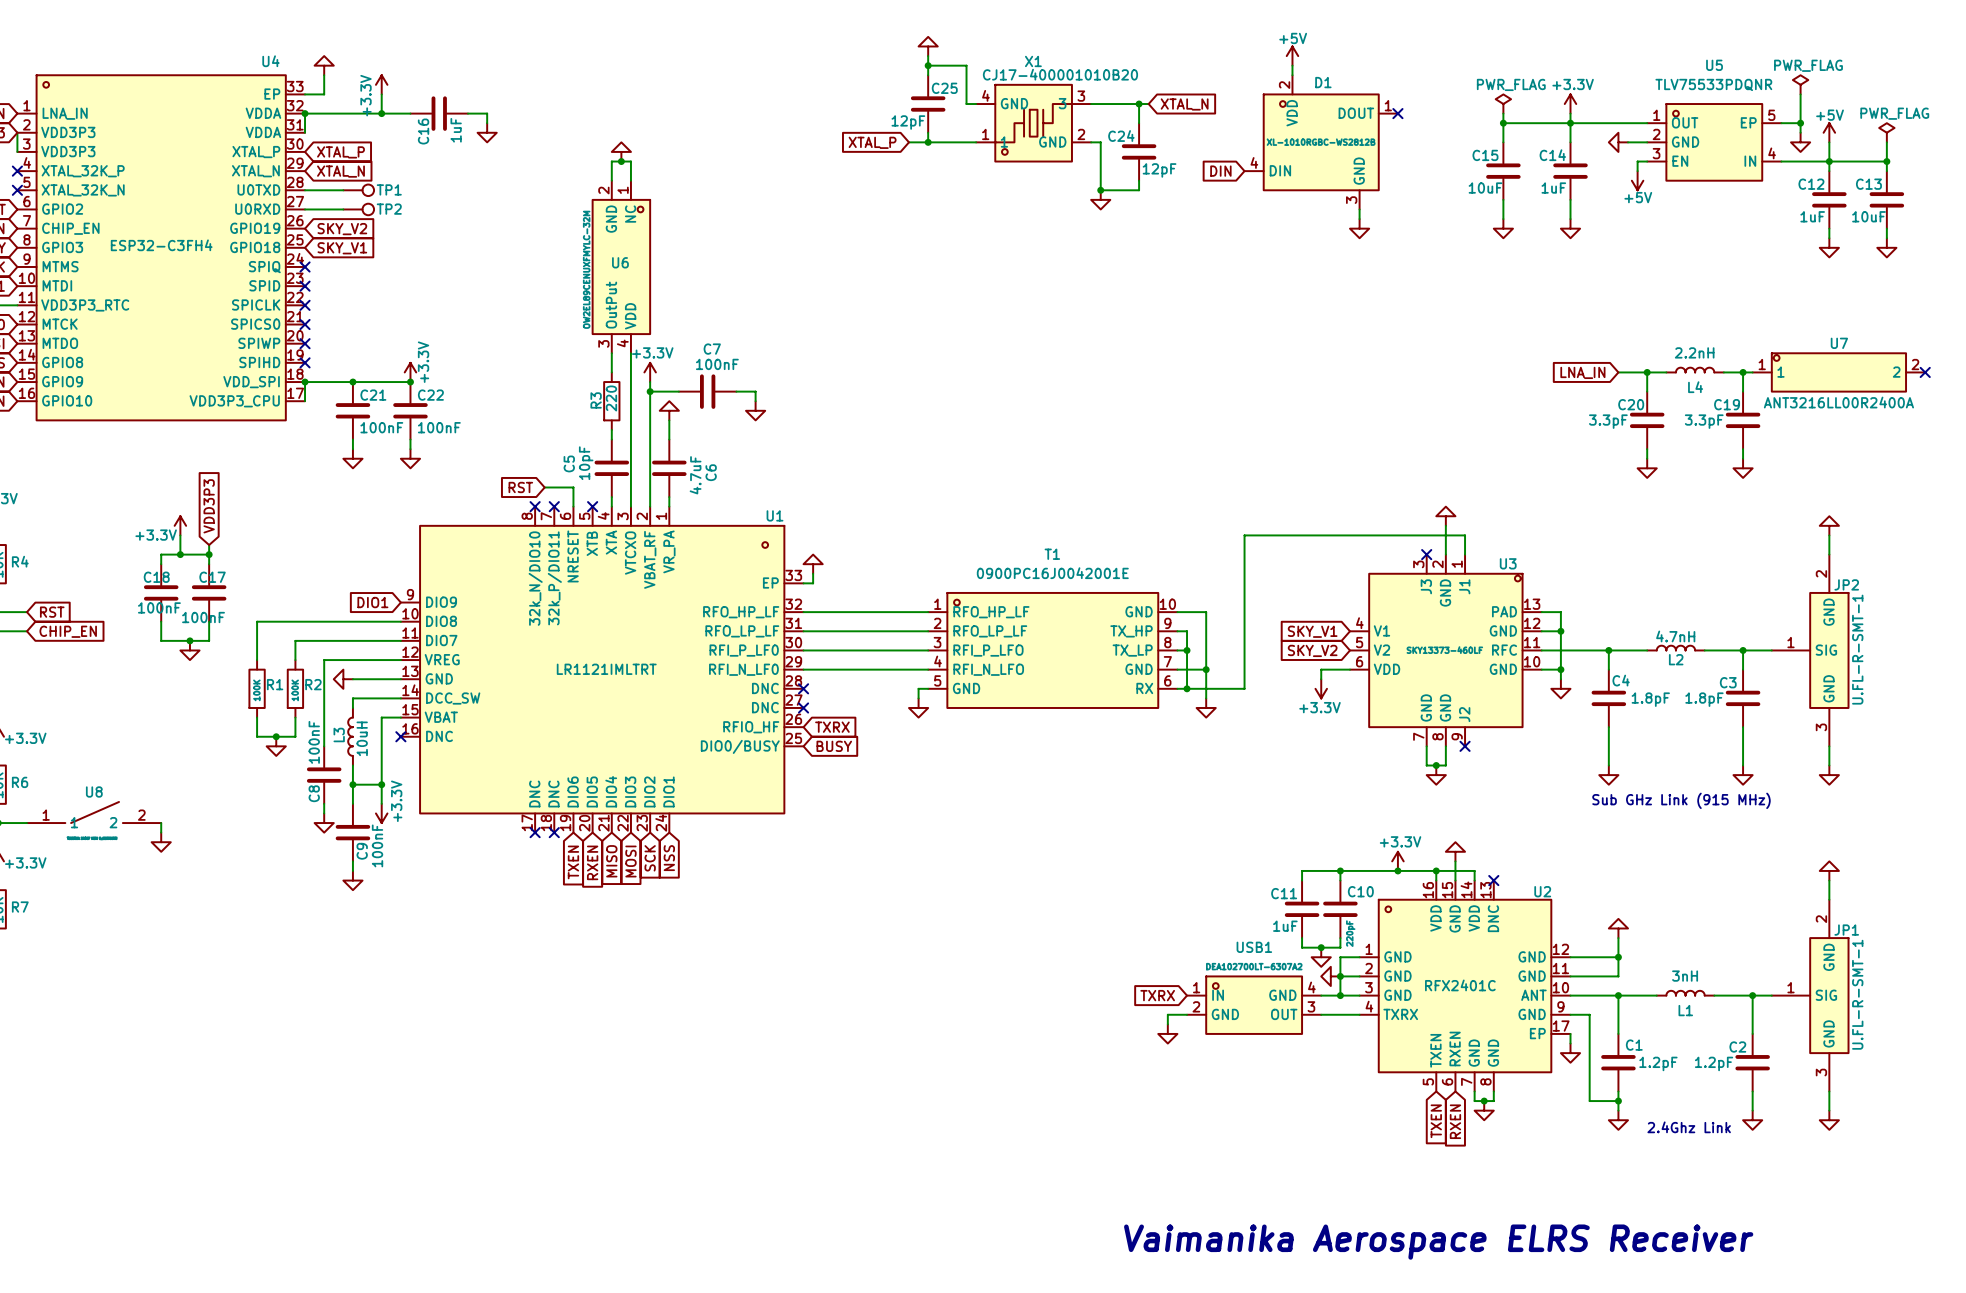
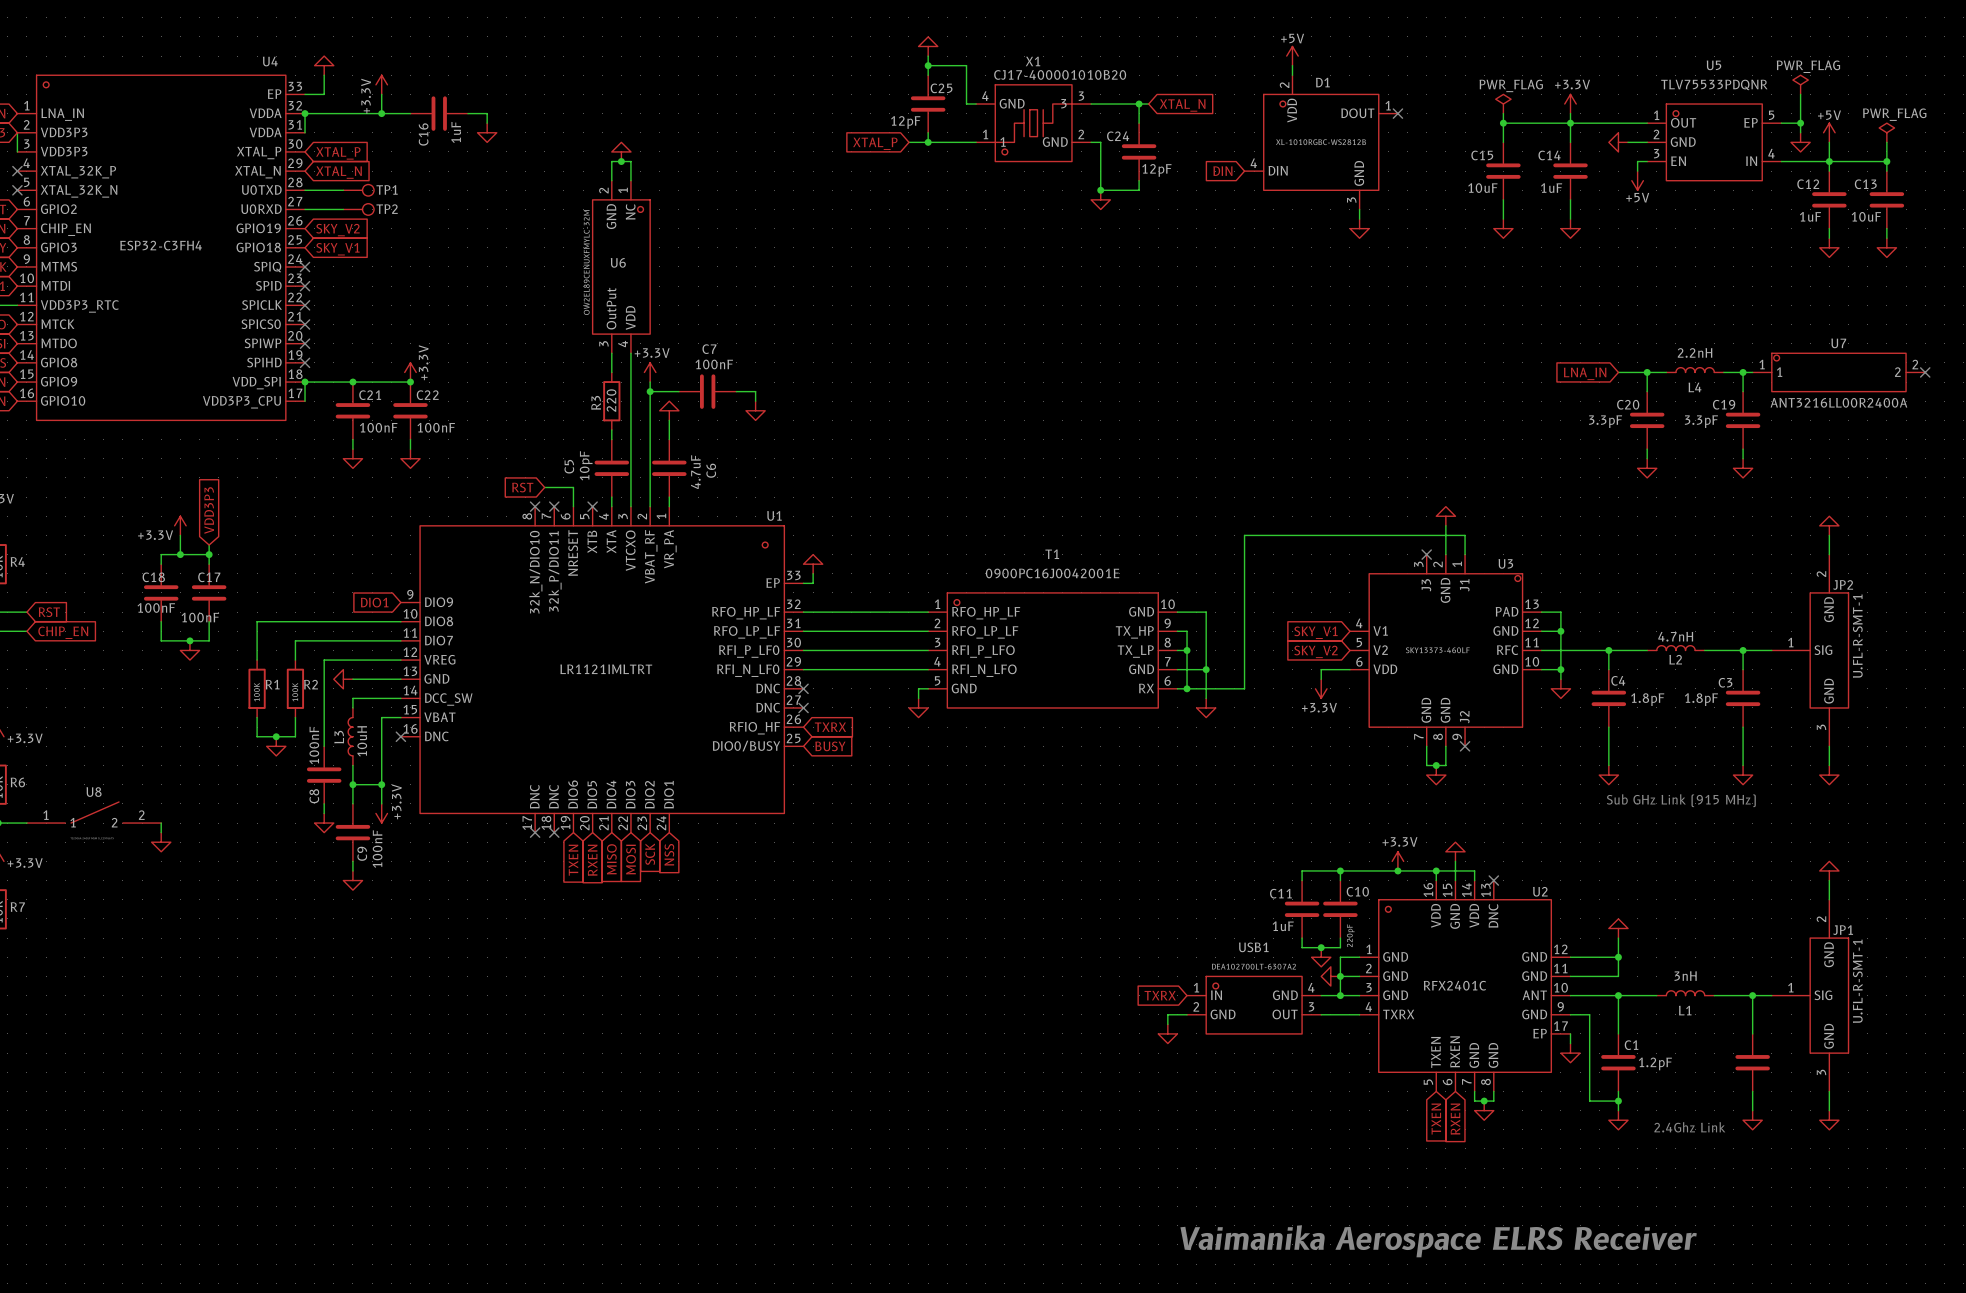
C2 name: C2 (1737, 1047) -> none
C2 value: 1.2pF (1714, 1063) -> none

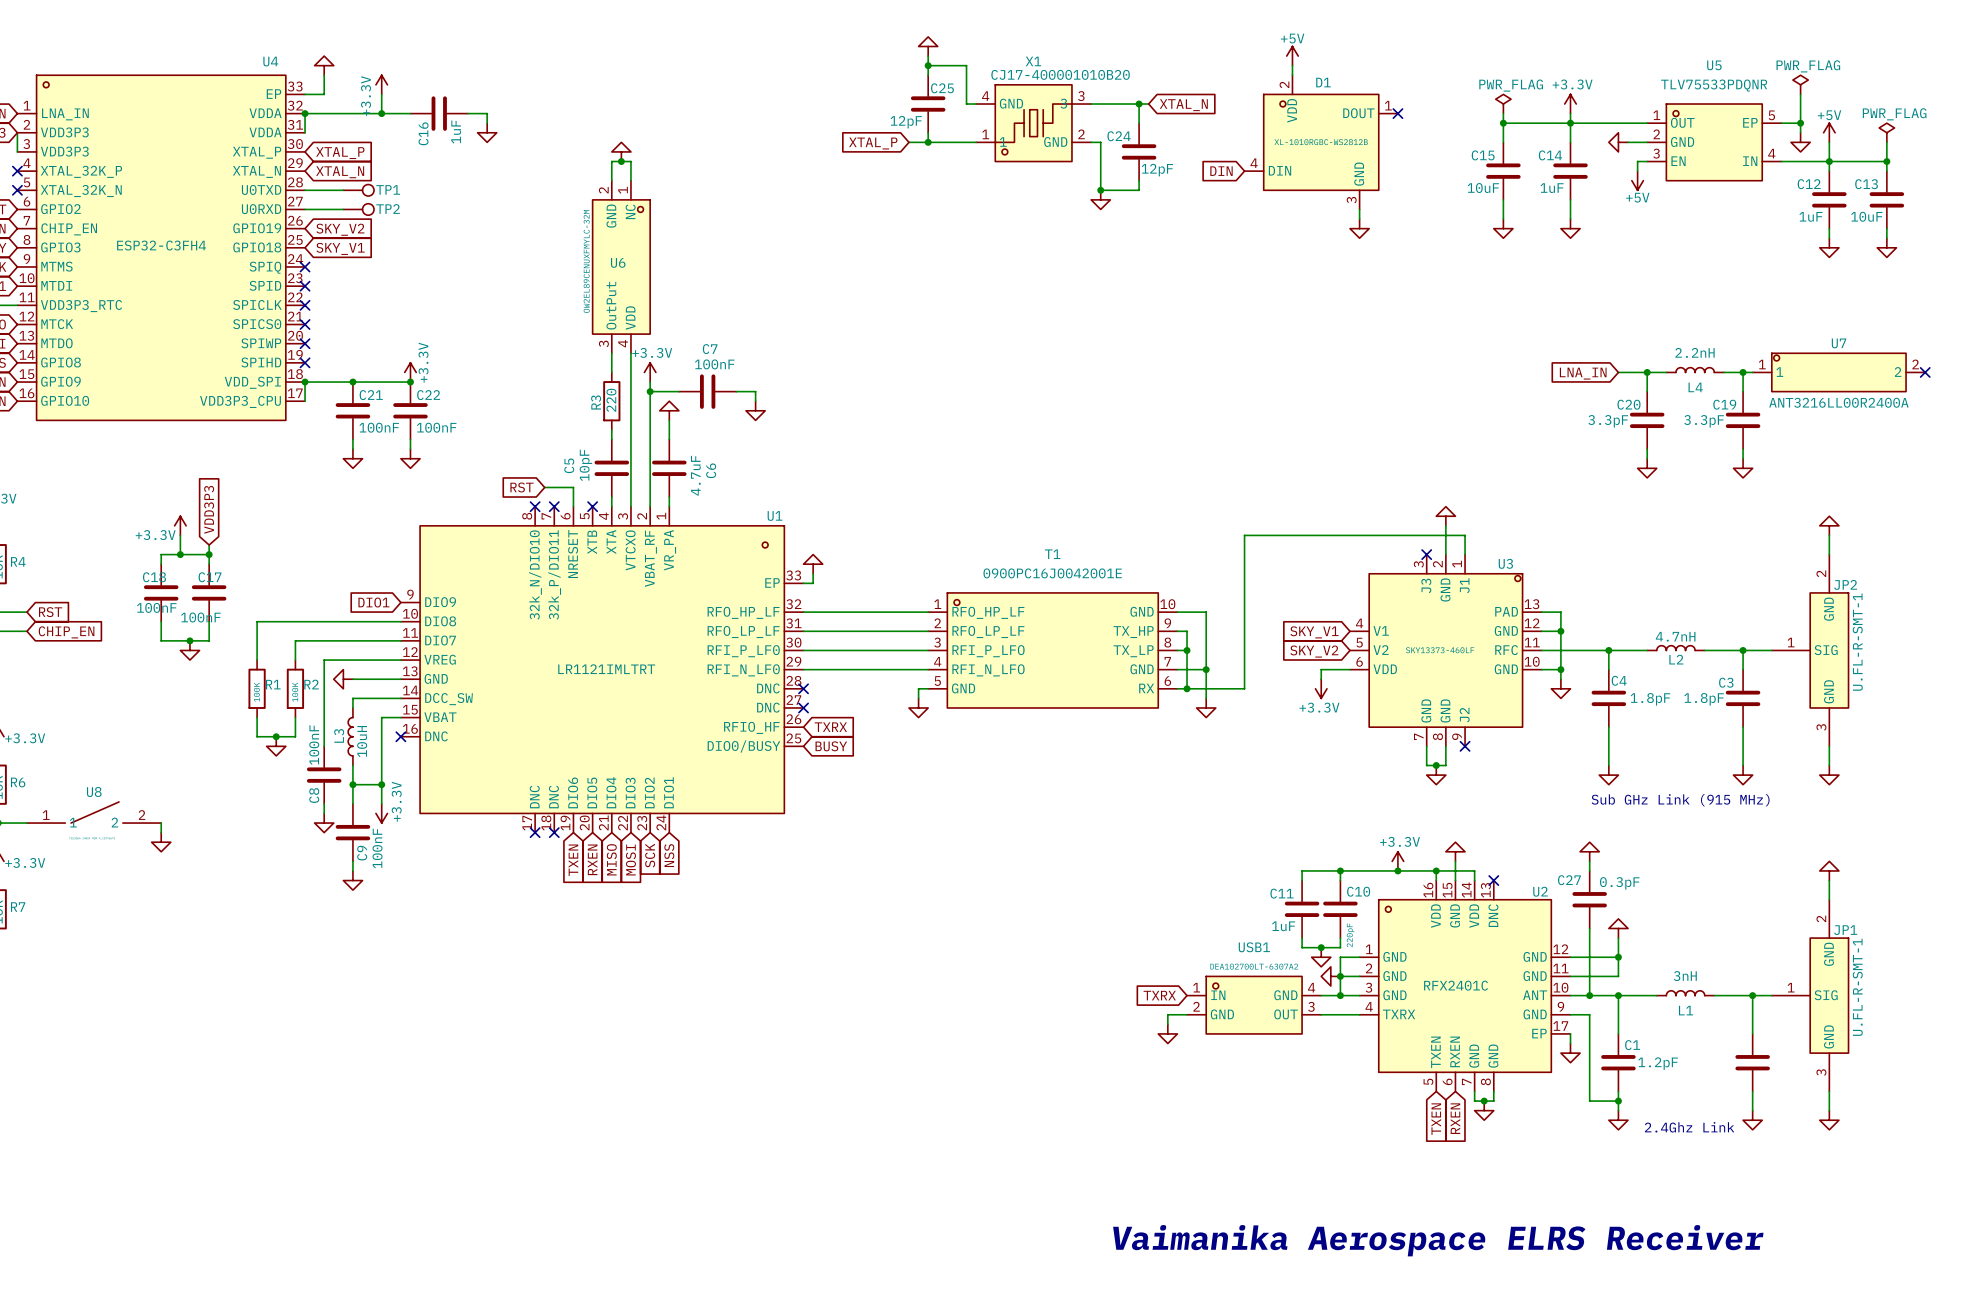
power symbol: none -> (1589, 851)
wire: none -> (1589, 861) (1589, 870)
C27: none -> 0.3pF (1589, 899)
wire: none -> (1589, 928) (1589, 995)
junction: none -> (1589, 995)

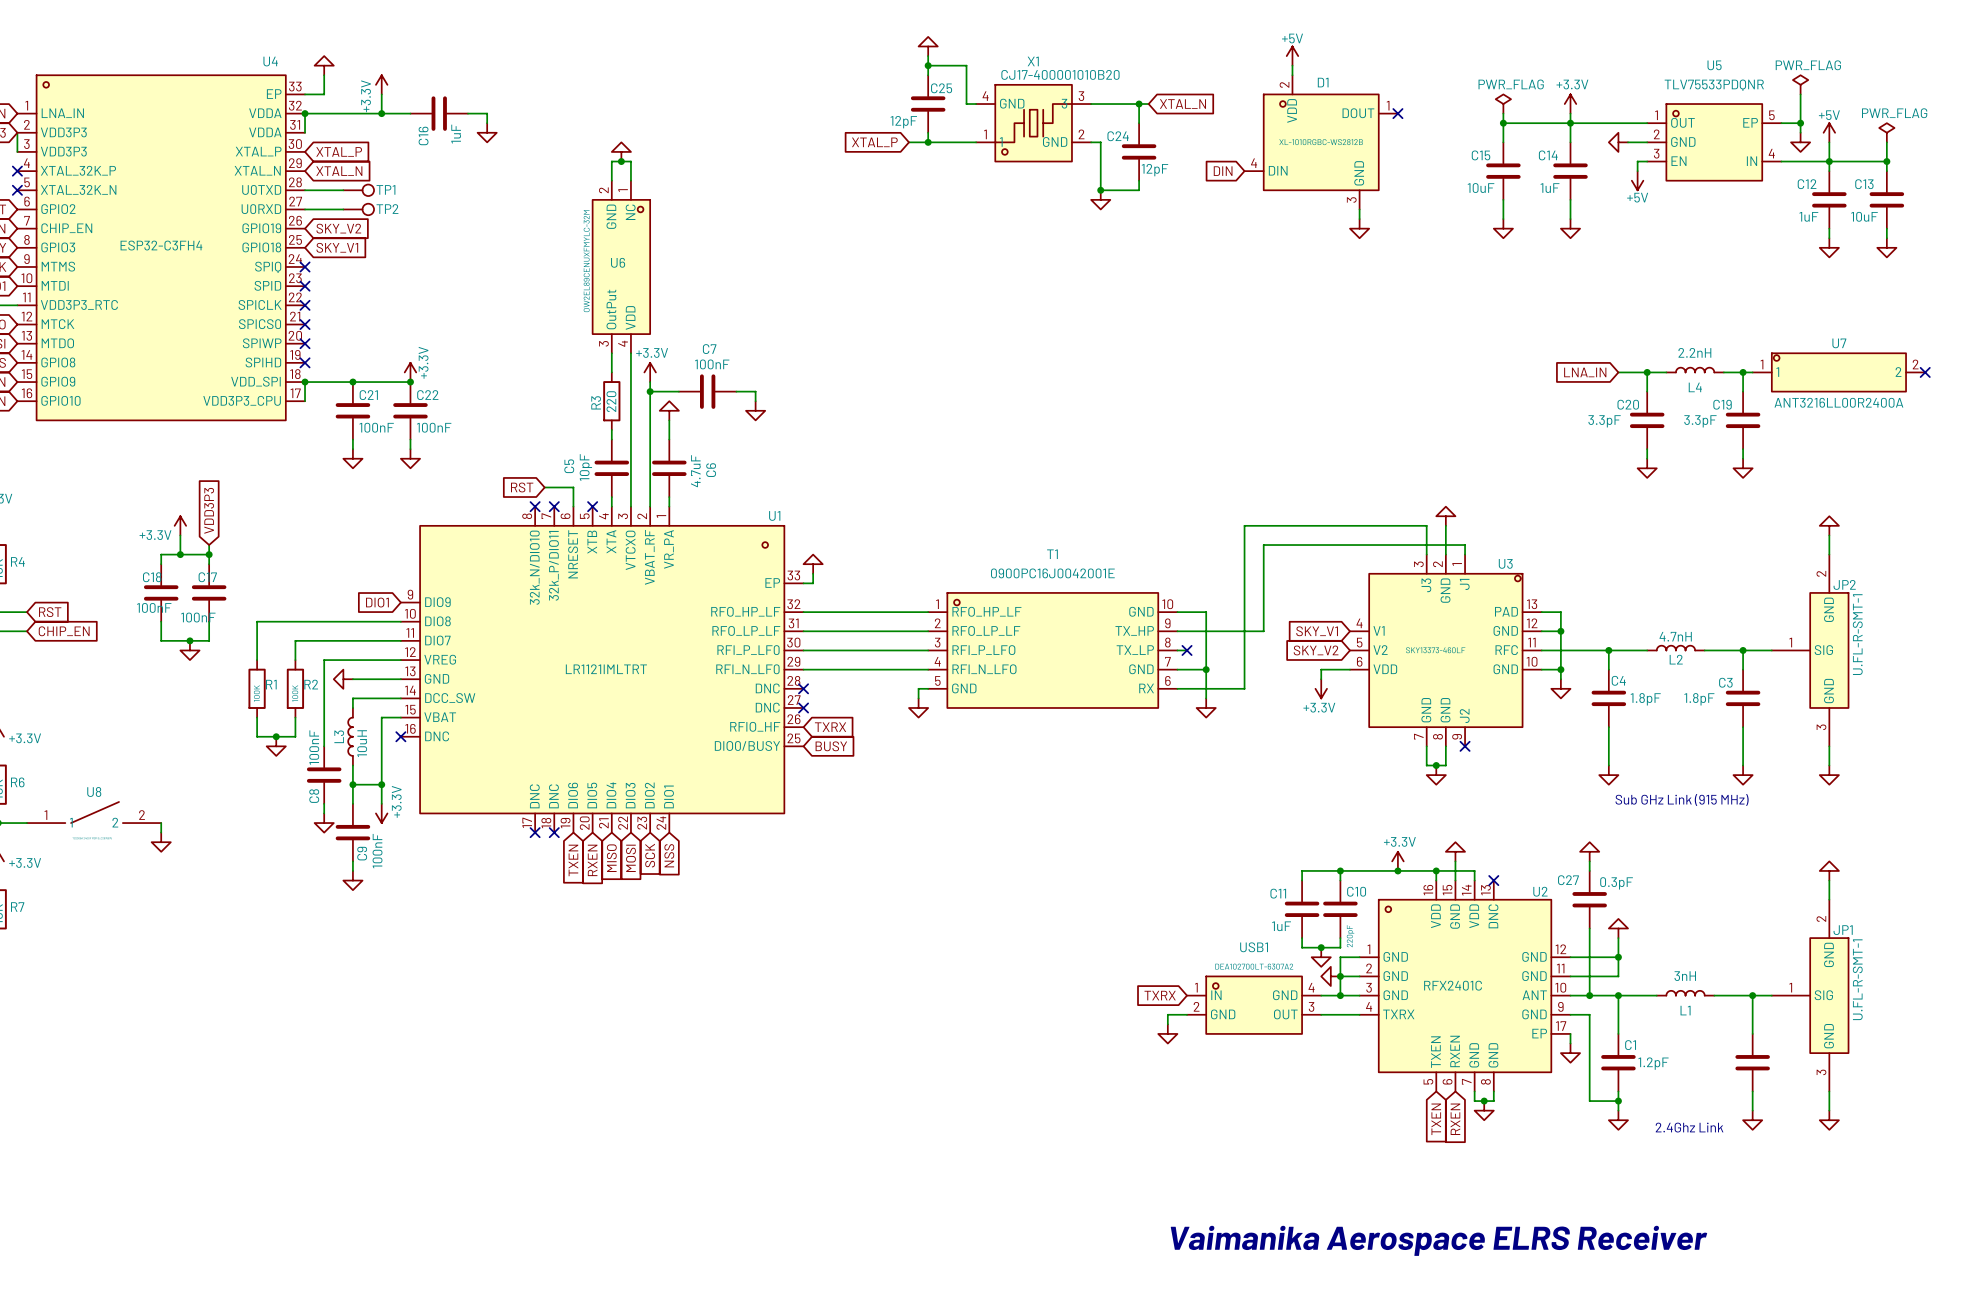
wire: (1244, 535) (1465, 535) (1465, 545) -> (1244, 535) (1244, 525) (1426, 525) (1426, 554)
no-connect mark: (1426, 554) -> none
wire: (1187, 631) (1187, 688) -> (1187, 631) (1263, 631) (1263, 545) (1465, 545)
junction: (1187, 650) -> none
no-connect mark: none -> (1187, 650)
junction: (1187, 688) -> none

